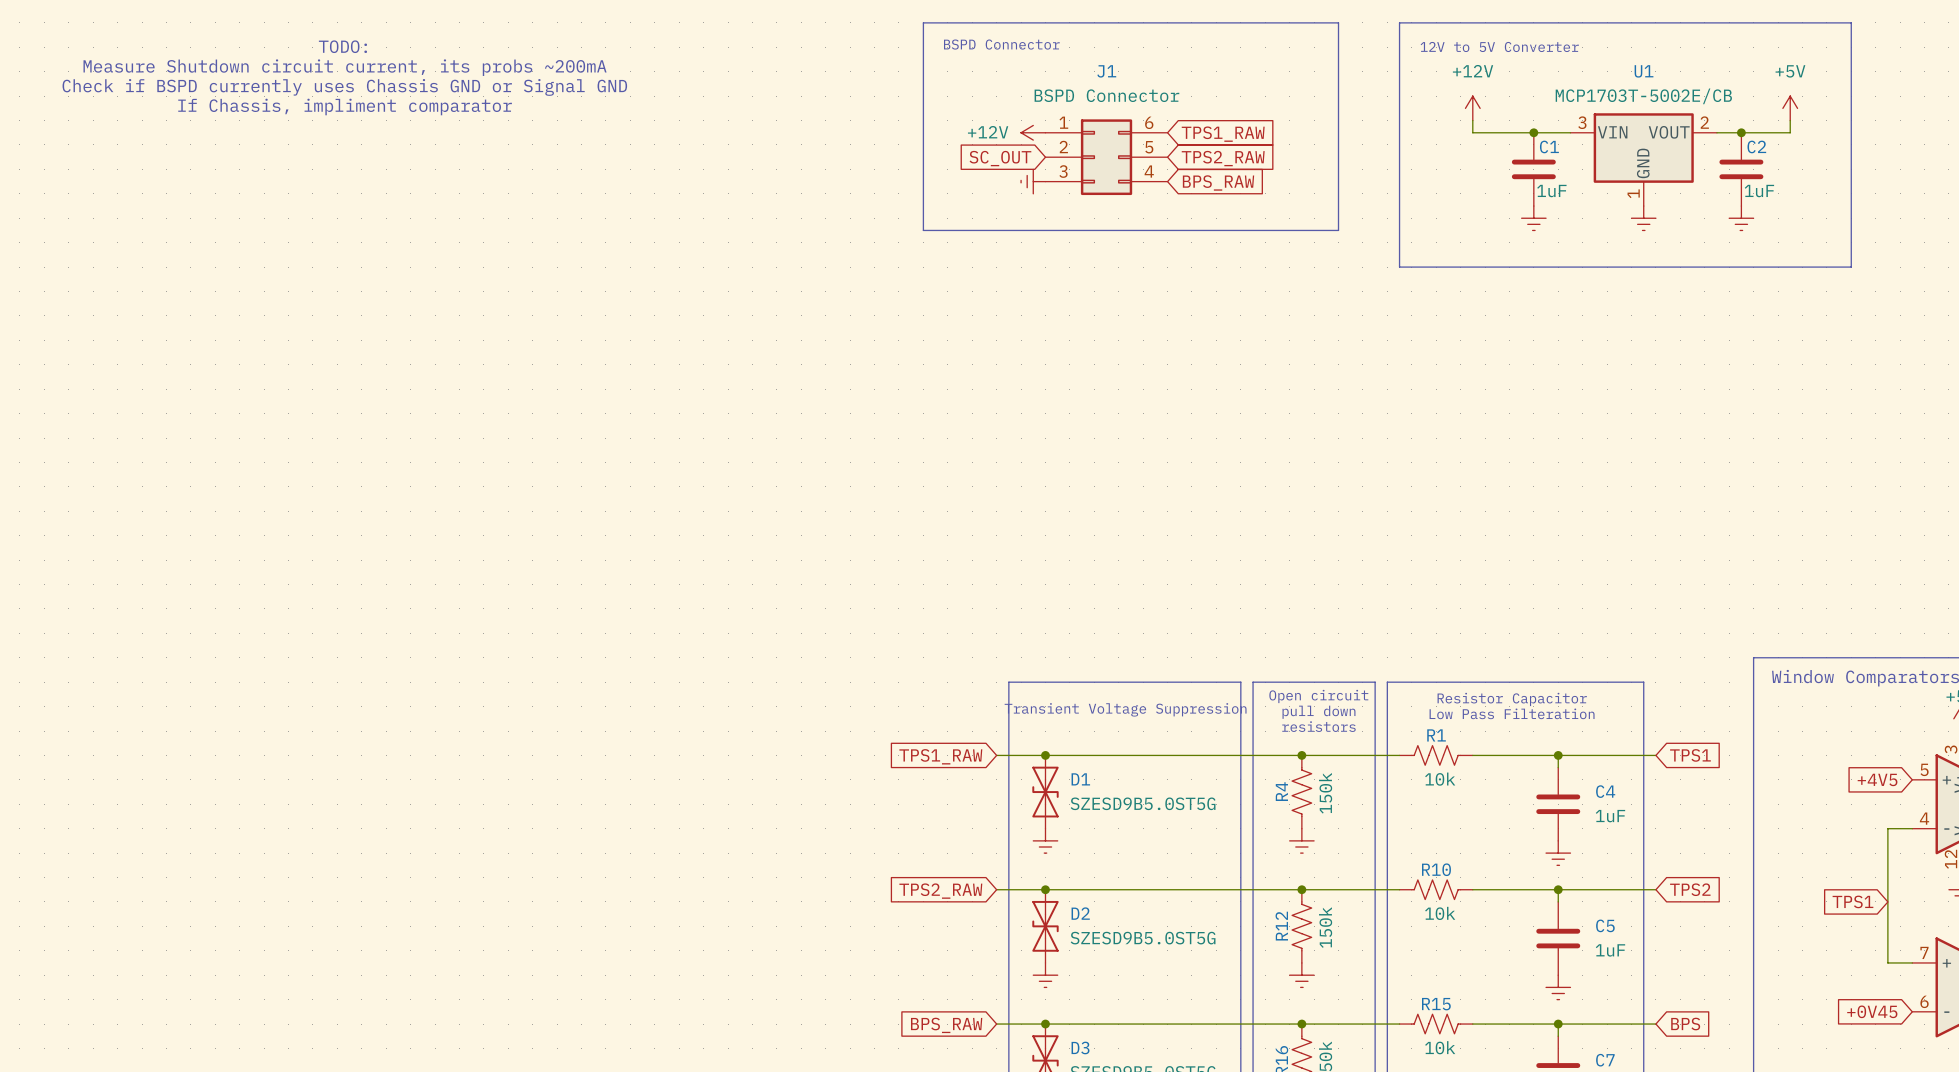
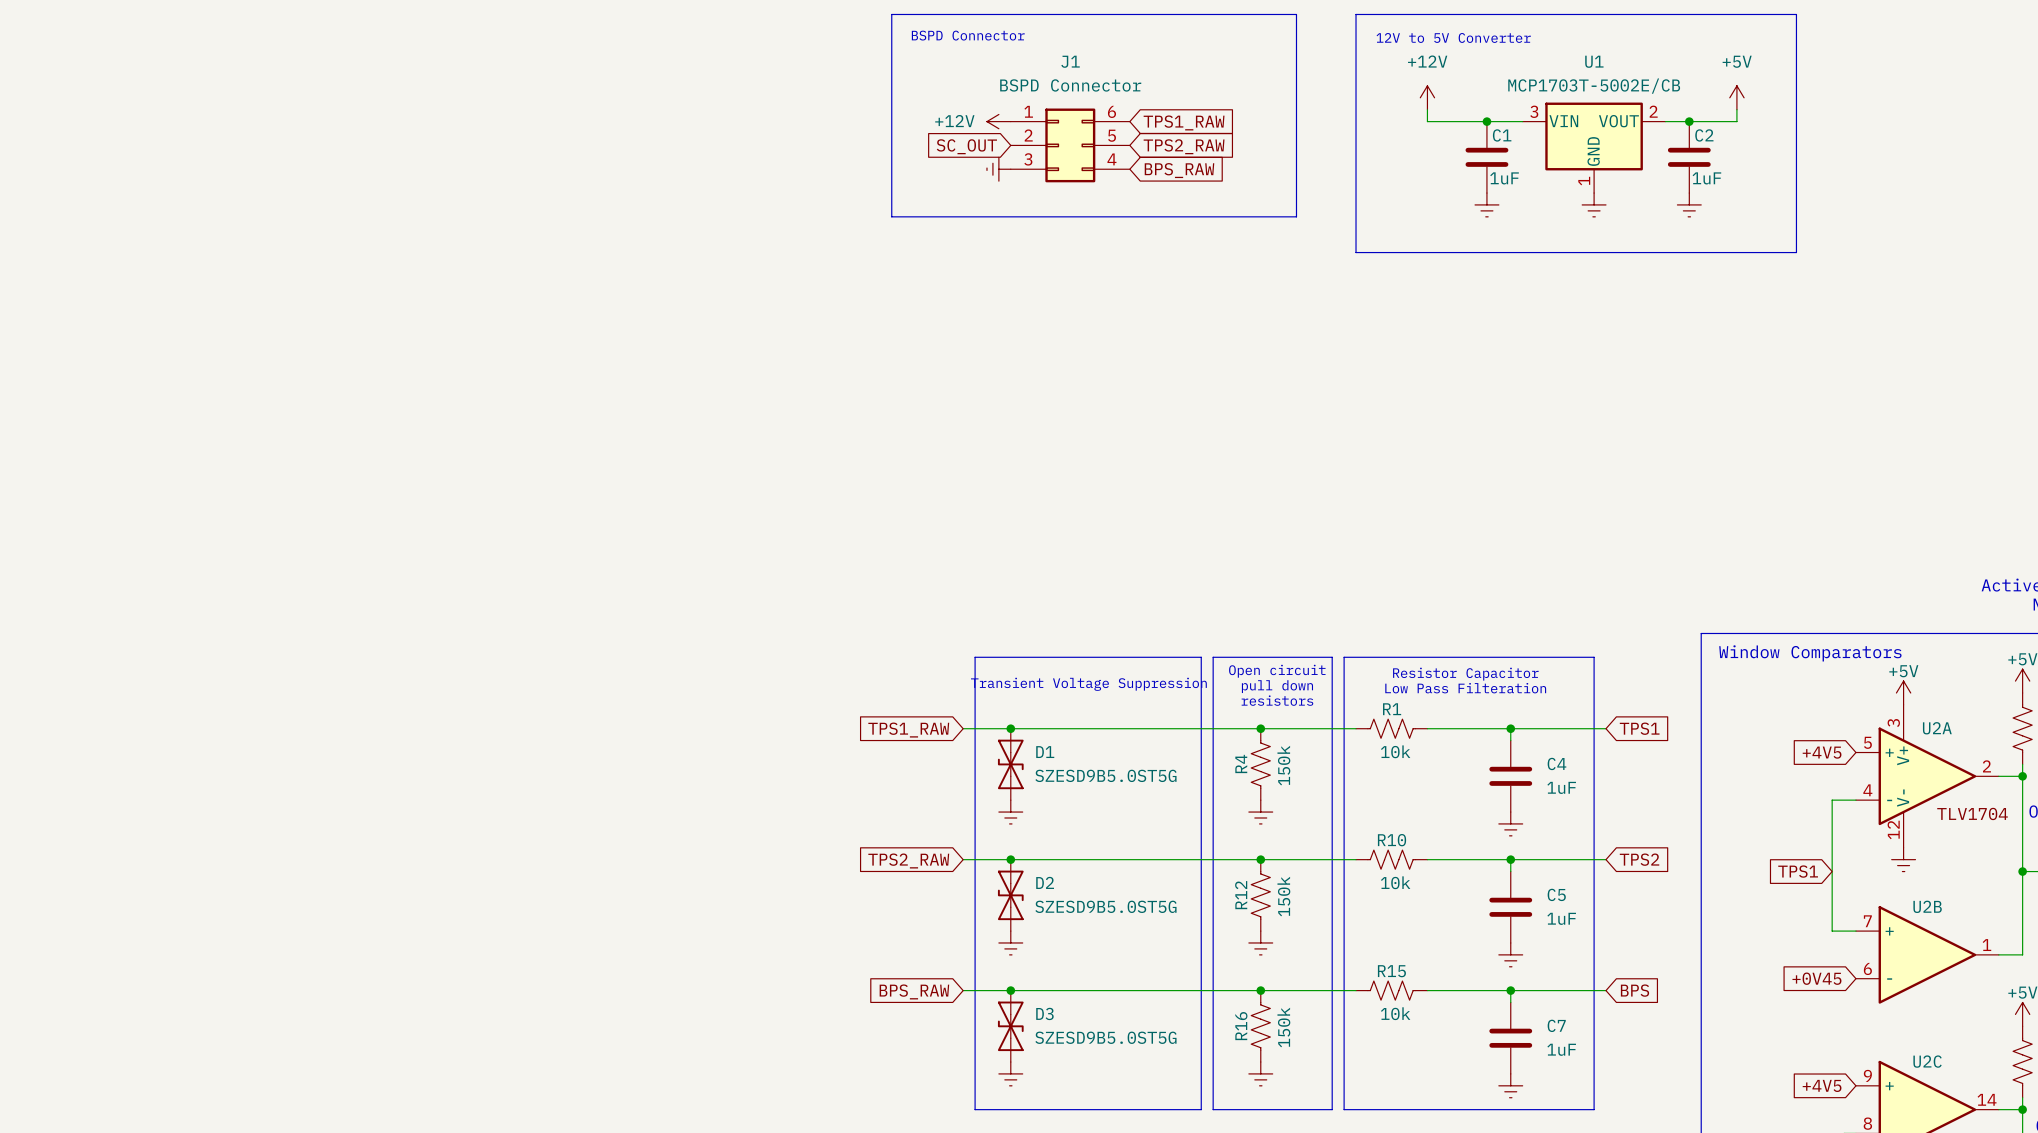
text: TODO: (342, 46) -> none
text: Measure Shutdown circuit current, its probs ~200mA (345, 67) -> none
text: Check if BSPD currently uses Chassis GND or Signal GND (344, 87) -> none
text: If Chassis, impliment comparator (345, 106) -> none

